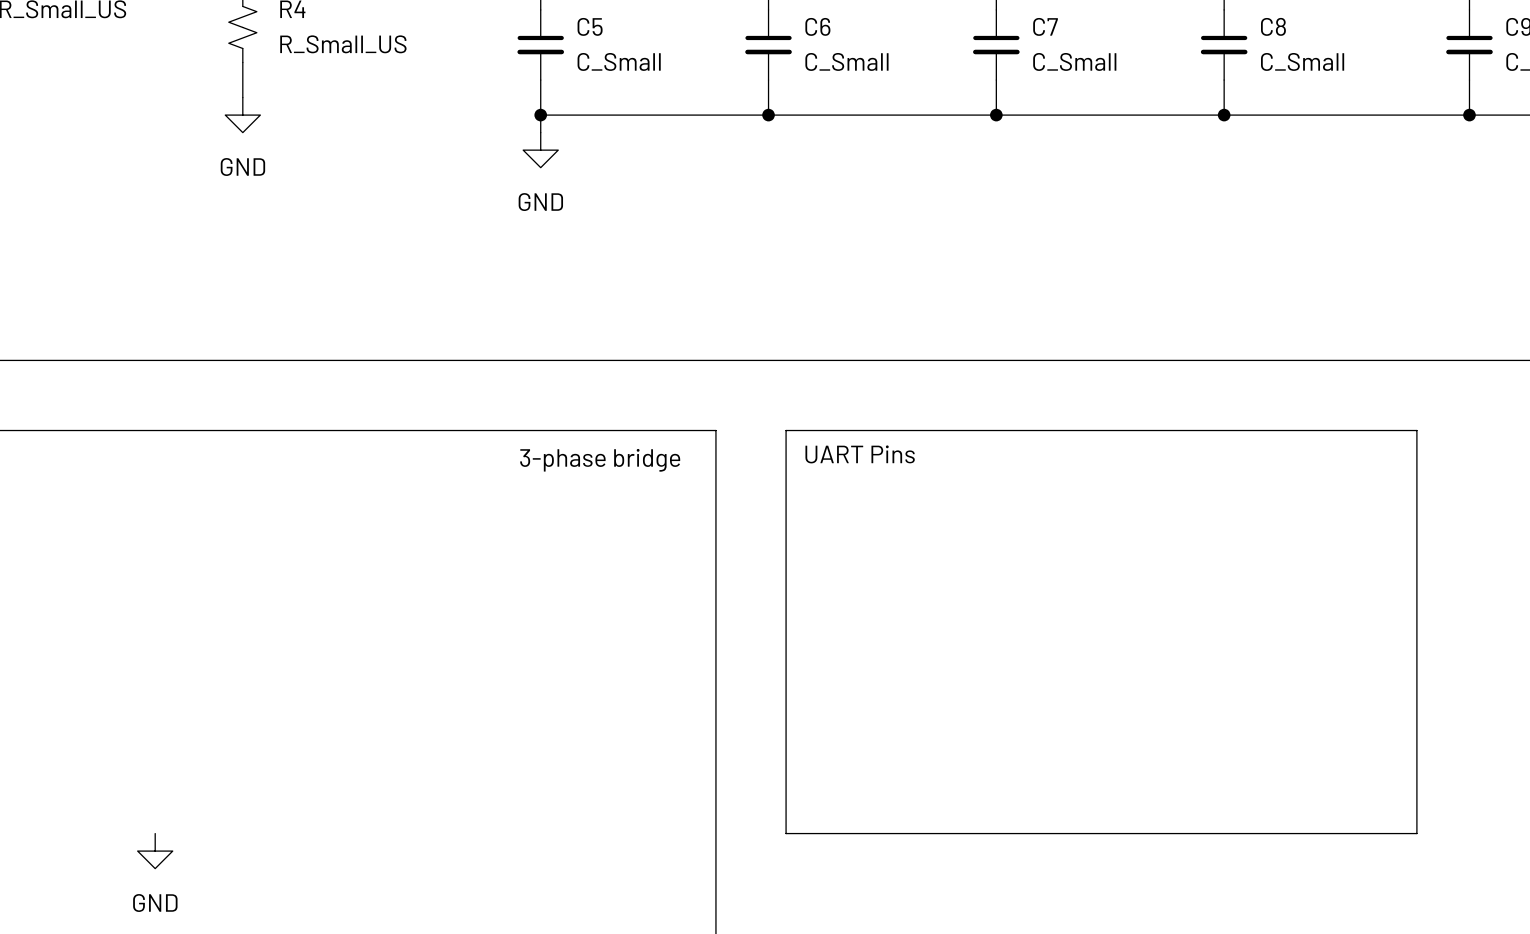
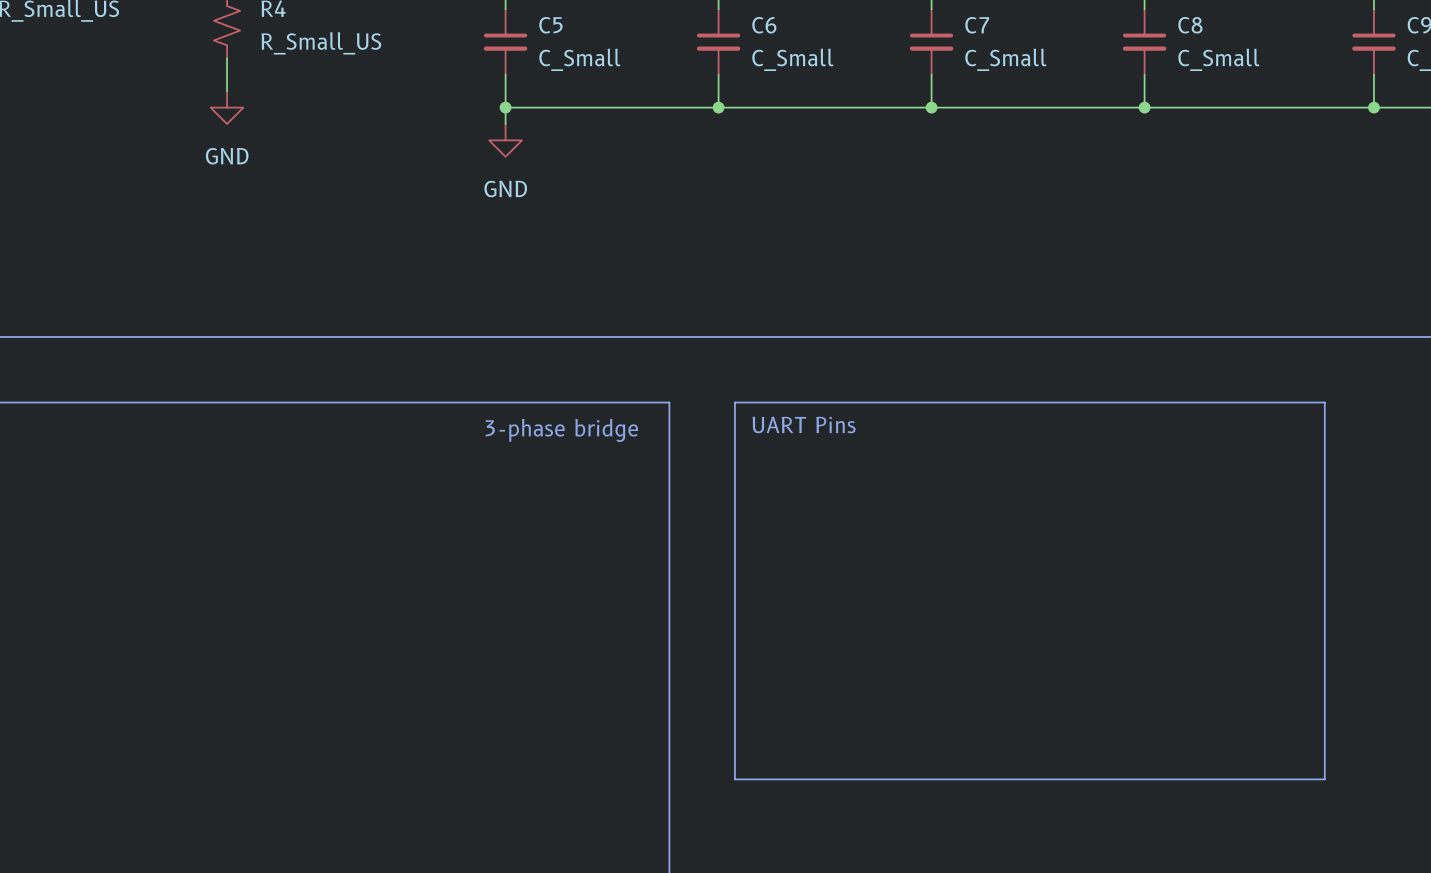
power symbol: GND (155, 851) -> none

